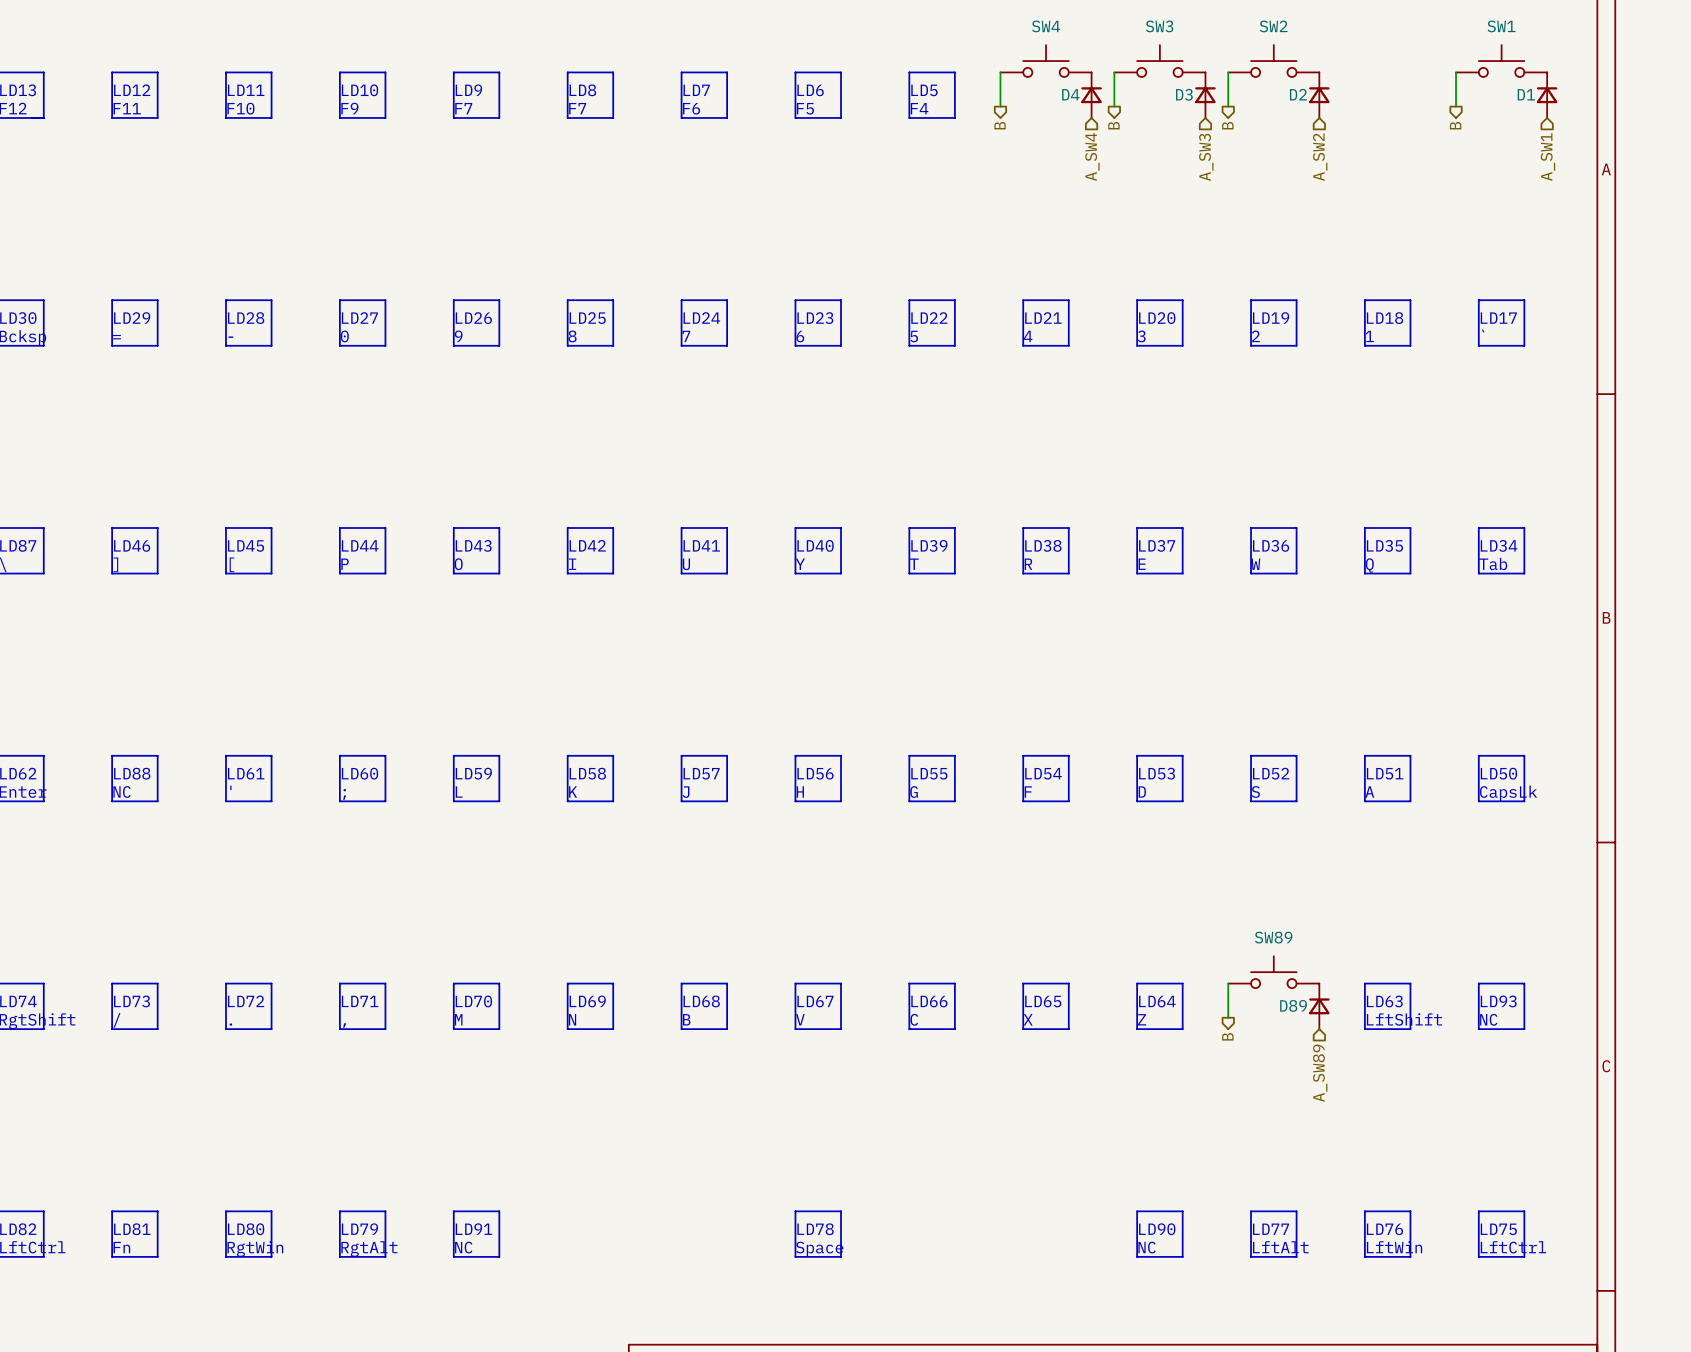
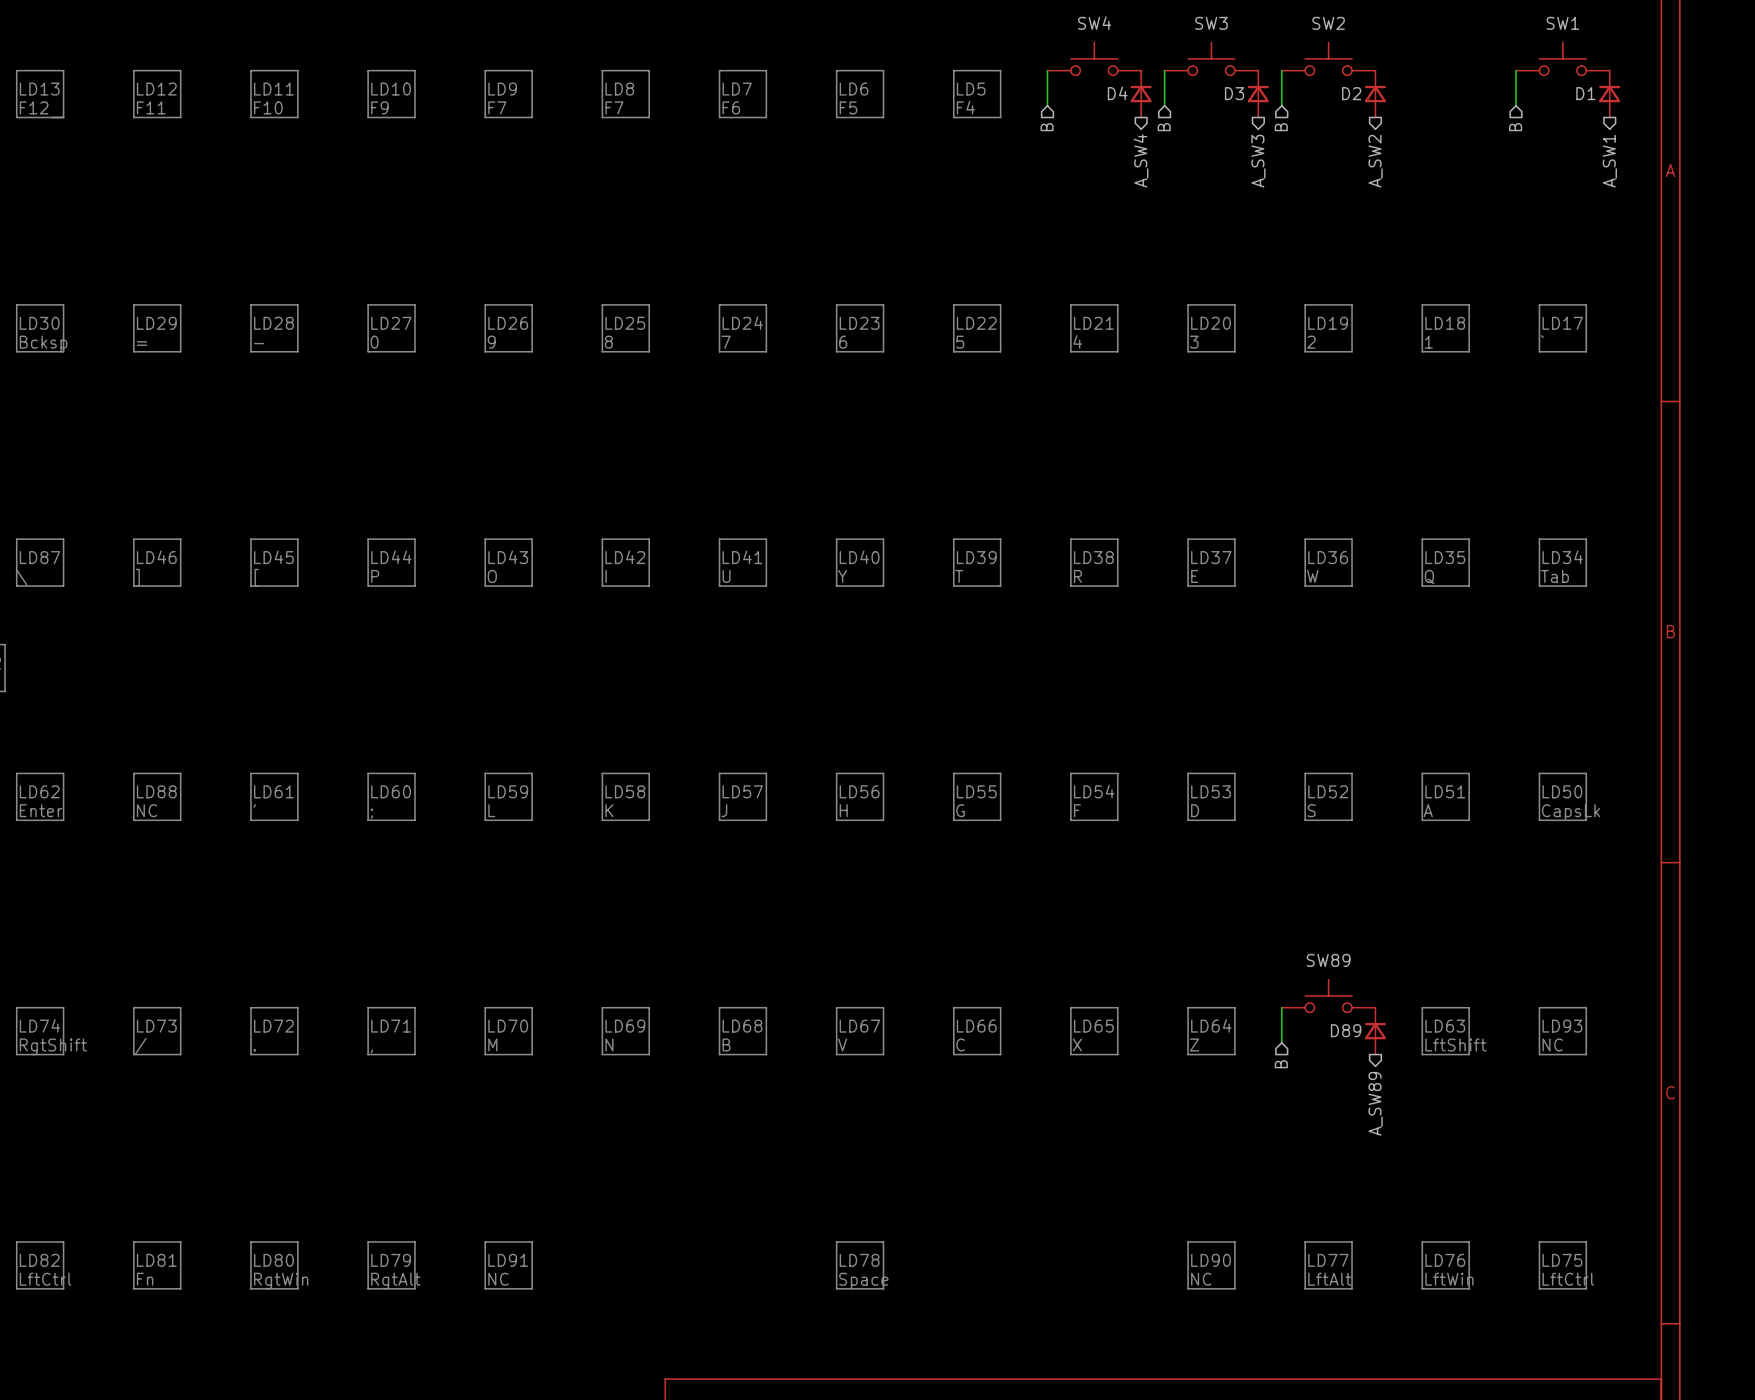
hierarchical label shape: output (1000, 125) -> input (1047, 127)
hierarchical label shape: output (1113, 125) -> input (1164, 127)
hierarchical label shape: output (1227, 125) -> input (1281, 127)
hierarchical label shape: output (1455, 125) -> input (1515, 127)
hierarchical label shape: input (1092, 156) -> output (1141, 160)
hierarchical label shape: input (1206, 157) -> output (1258, 161)
hierarchical label shape: input (1320, 157) -> output (1375, 161)
hierarchical label shape: input (1547, 157) -> output (1609, 161)
hierarchical label shape: output (1227, 1036) -> input (1281, 1064)
hierarchical label shape: input (1320, 1073) -> output (1375, 1103)

